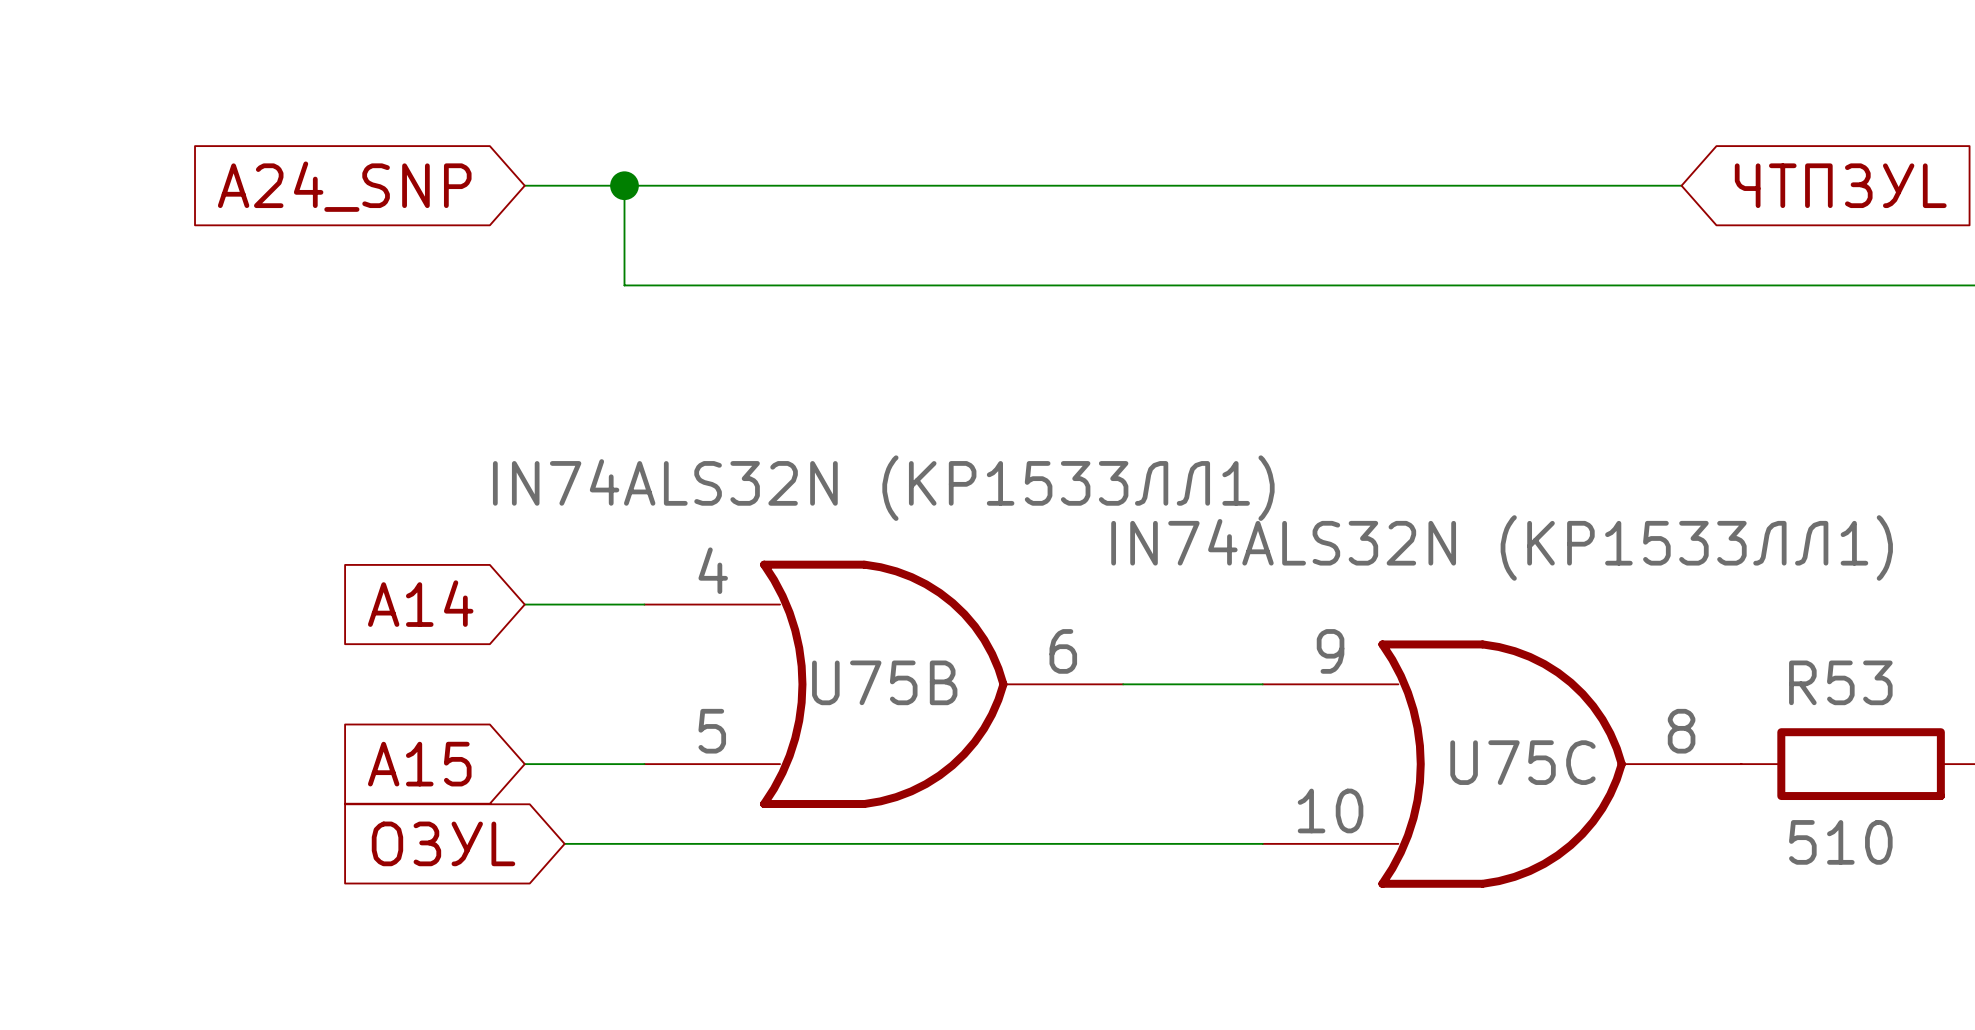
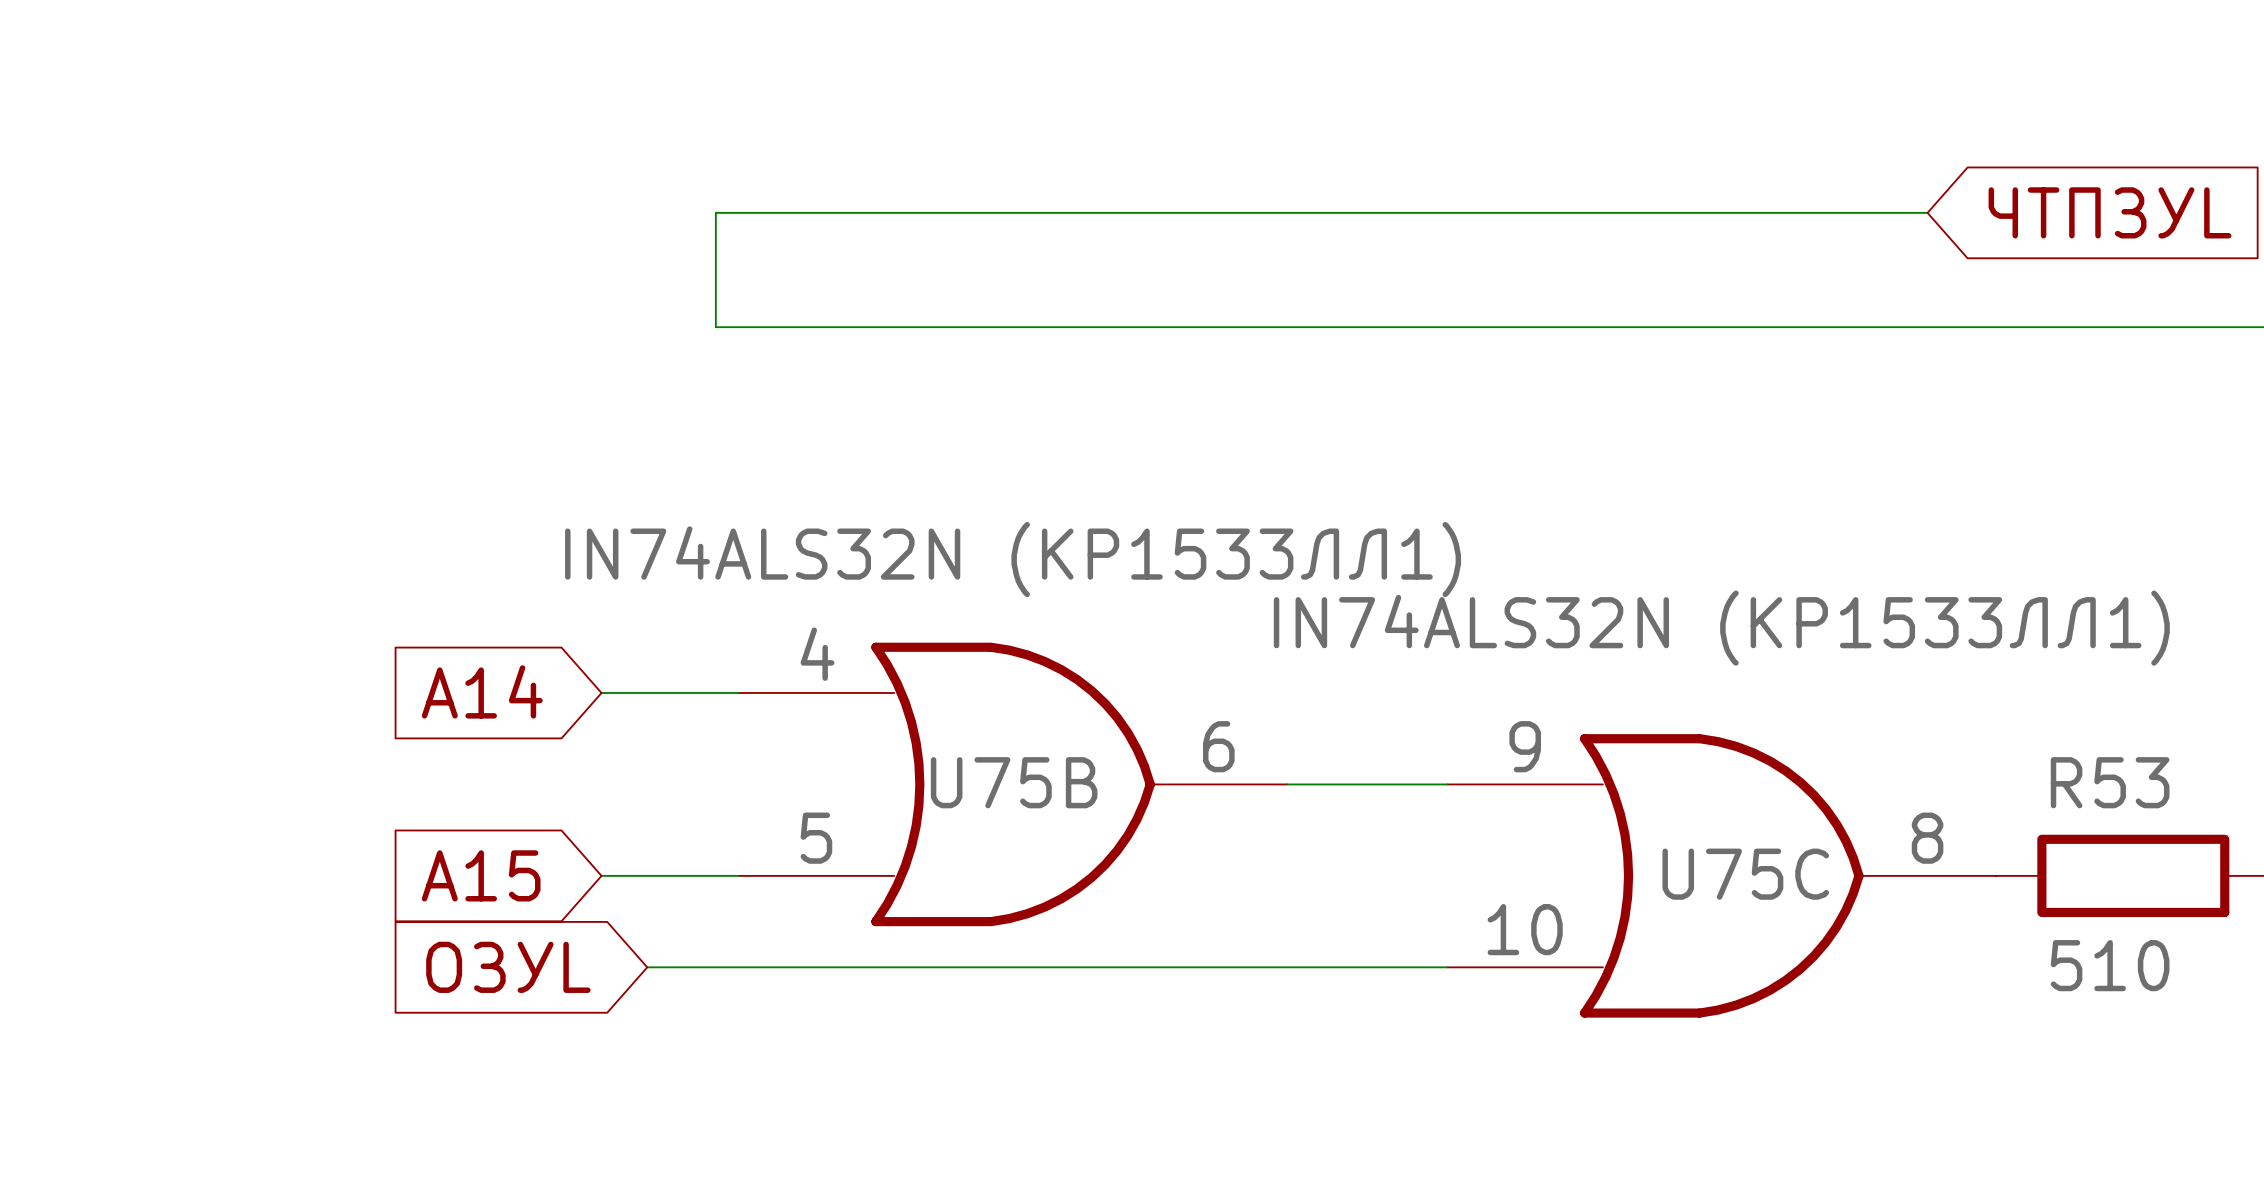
wire: (524, 185) (624, 185) -> none
junction: (624, 185) -> none
global label: A24_SNP (344, 186) -> none

